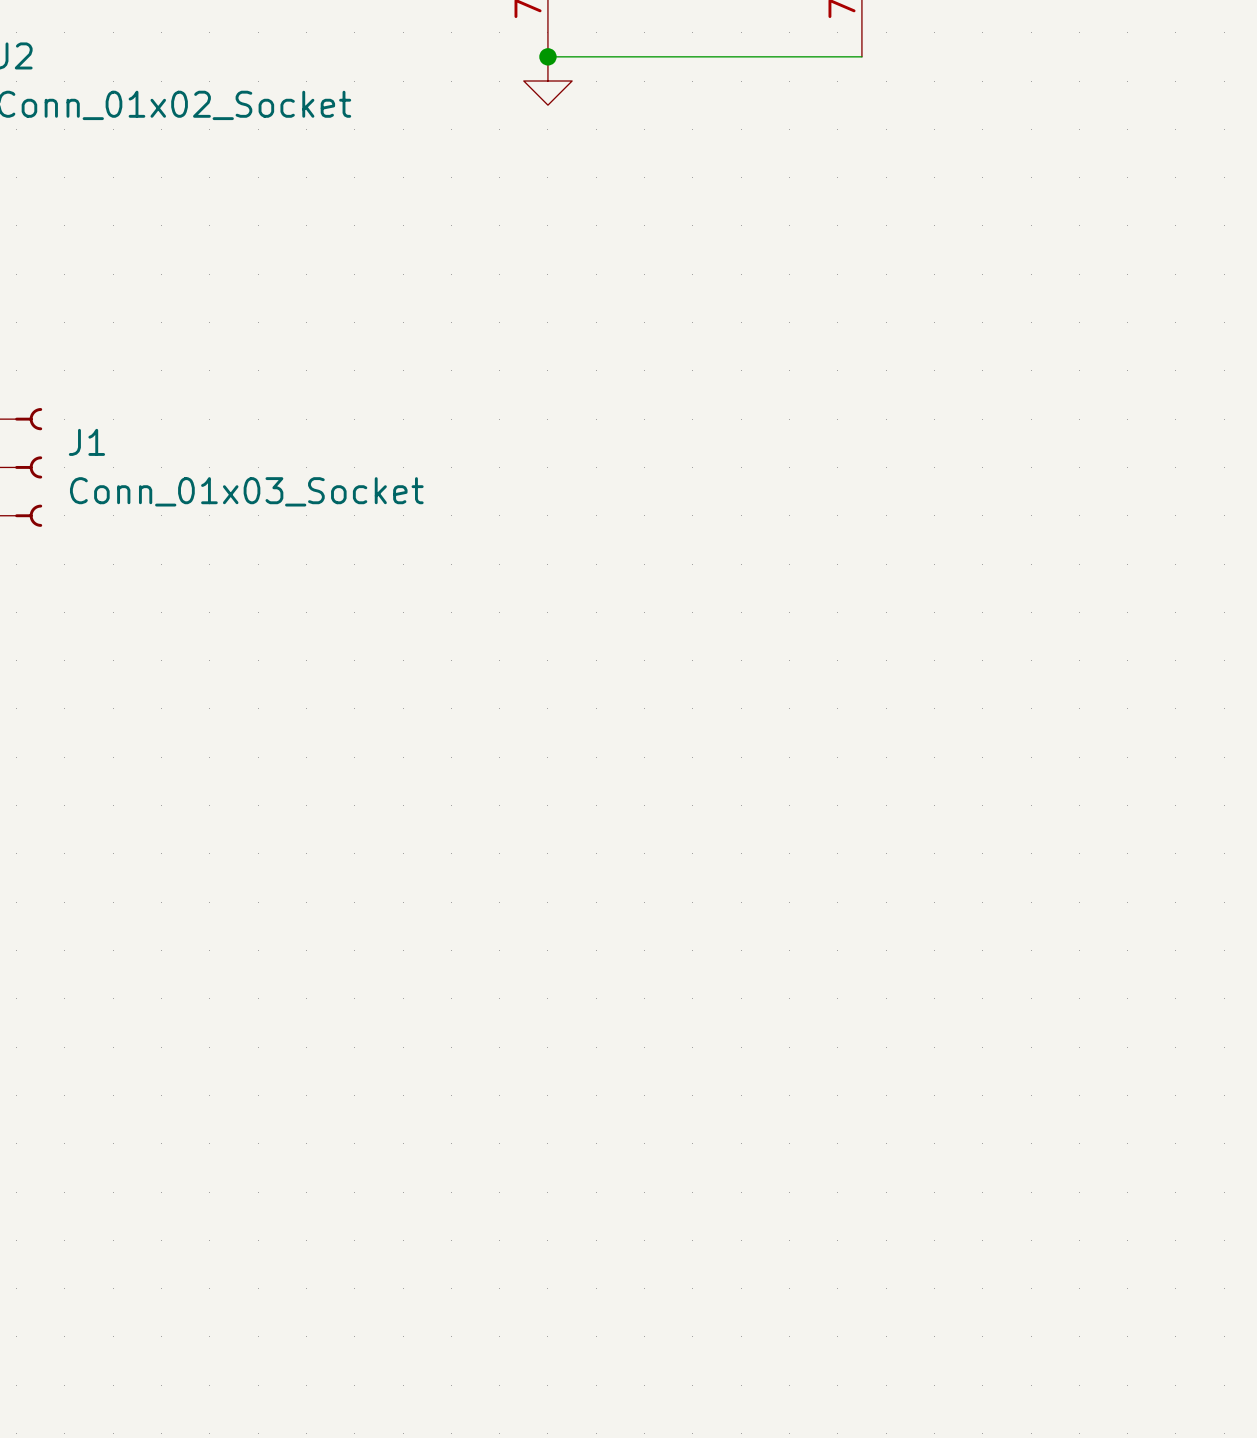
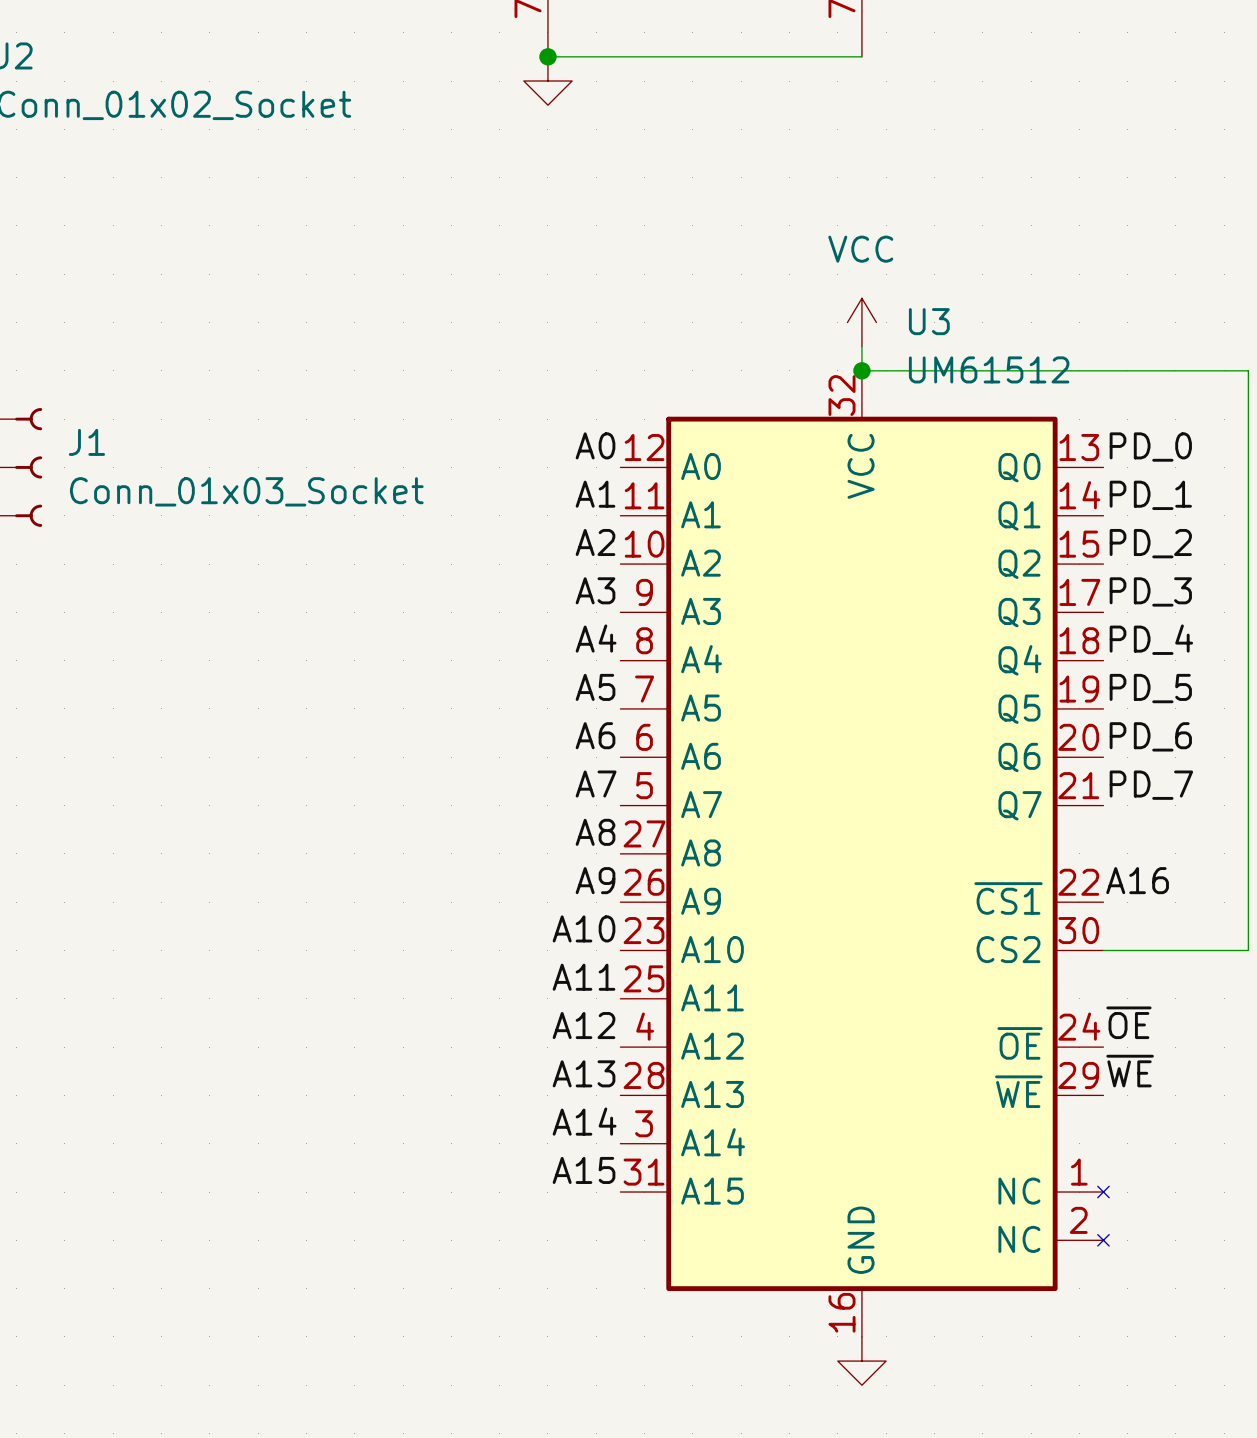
power symbol: none -> VCC (861, 322)
wire: none -> (861, 346) (861, 370) (1248, 370) (1248, 950) (1103, 950)
junction: none -> (861, 370)
label: none -> A0 (595, 445)
label: none -> PD_0 (1150, 447)
label: none -> A1 (595, 494)
label: none -> PD_1 (1150, 495)
label: none -> A2 (595, 542)
label: none -> PD_2 (1150, 543)
label: none -> A3 (595, 590)
label: none -> PD_3 (1150, 591)
label: none -> A4 (596, 638)
label: none -> PD_4 (1151, 639)
label: none -> A5 (595, 687)
label: none -> PD_5 (1150, 688)
label: none -> A6 (595, 735)
label: none -> PD_6 (1150, 736)
label: none -> A7 (596, 784)
label: none -> PD_7 (1151, 785)
label: none -> A8 (595, 832)
U3: none -> UM61512 (864, 853)
label: none -> A9 (595, 880)
label: none -> A16 (1137, 880)
label: none -> A10 (584, 928)
label: none -> A11 (584, 977)
label: none -> ~{OE} (1128, 1022)
label: none -> A12 (584, 1025)
label: none -> ~{WE} (1130, 1071)
label: none -> A13 (584, 1073)
label: none -> A14 (584, 1121)
label: none -> A15 (584, 1170)
power symbol: none -> (861, 1361)

